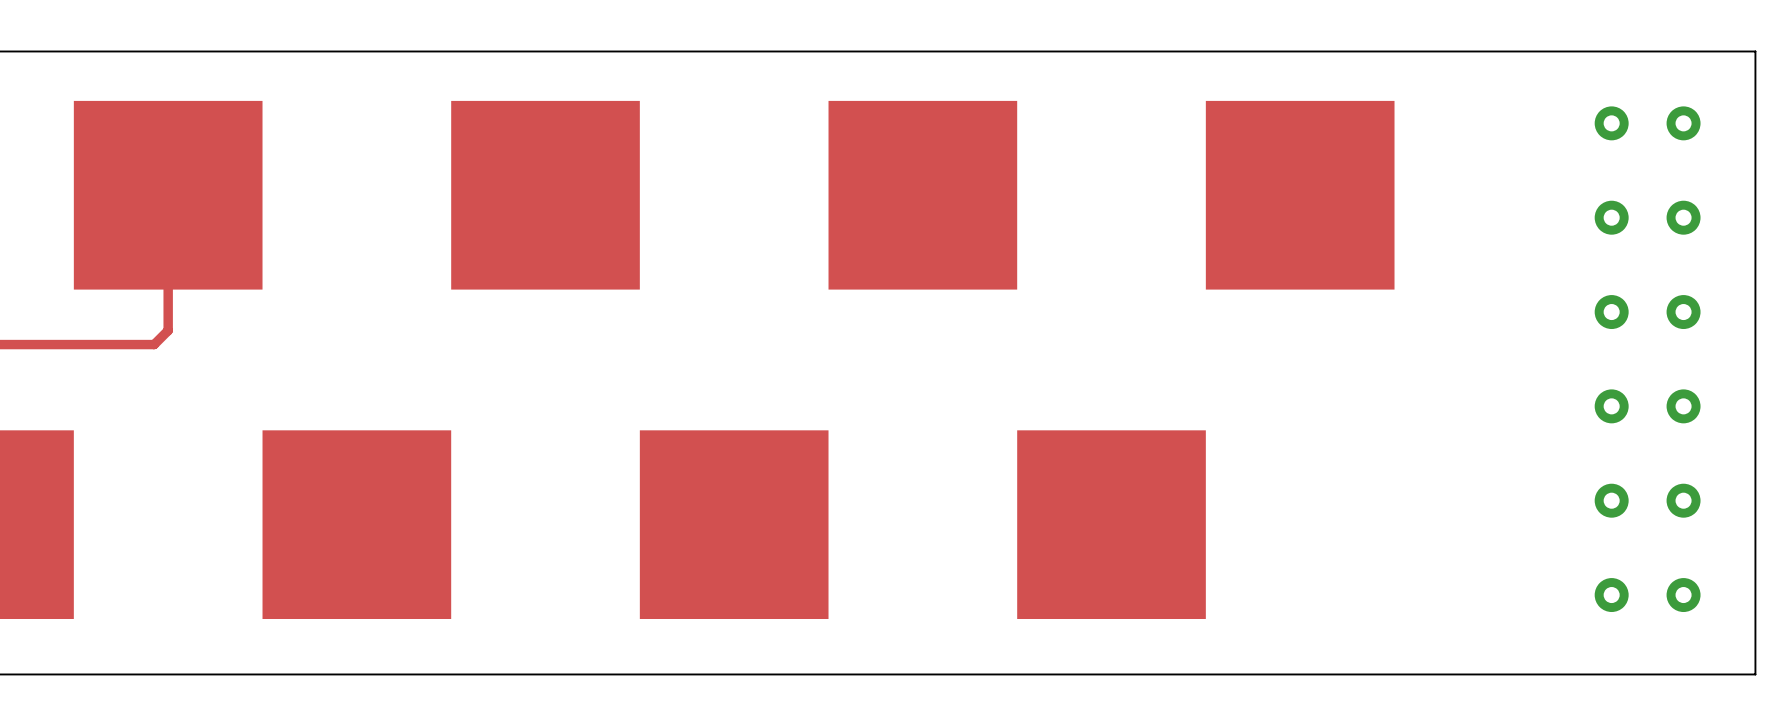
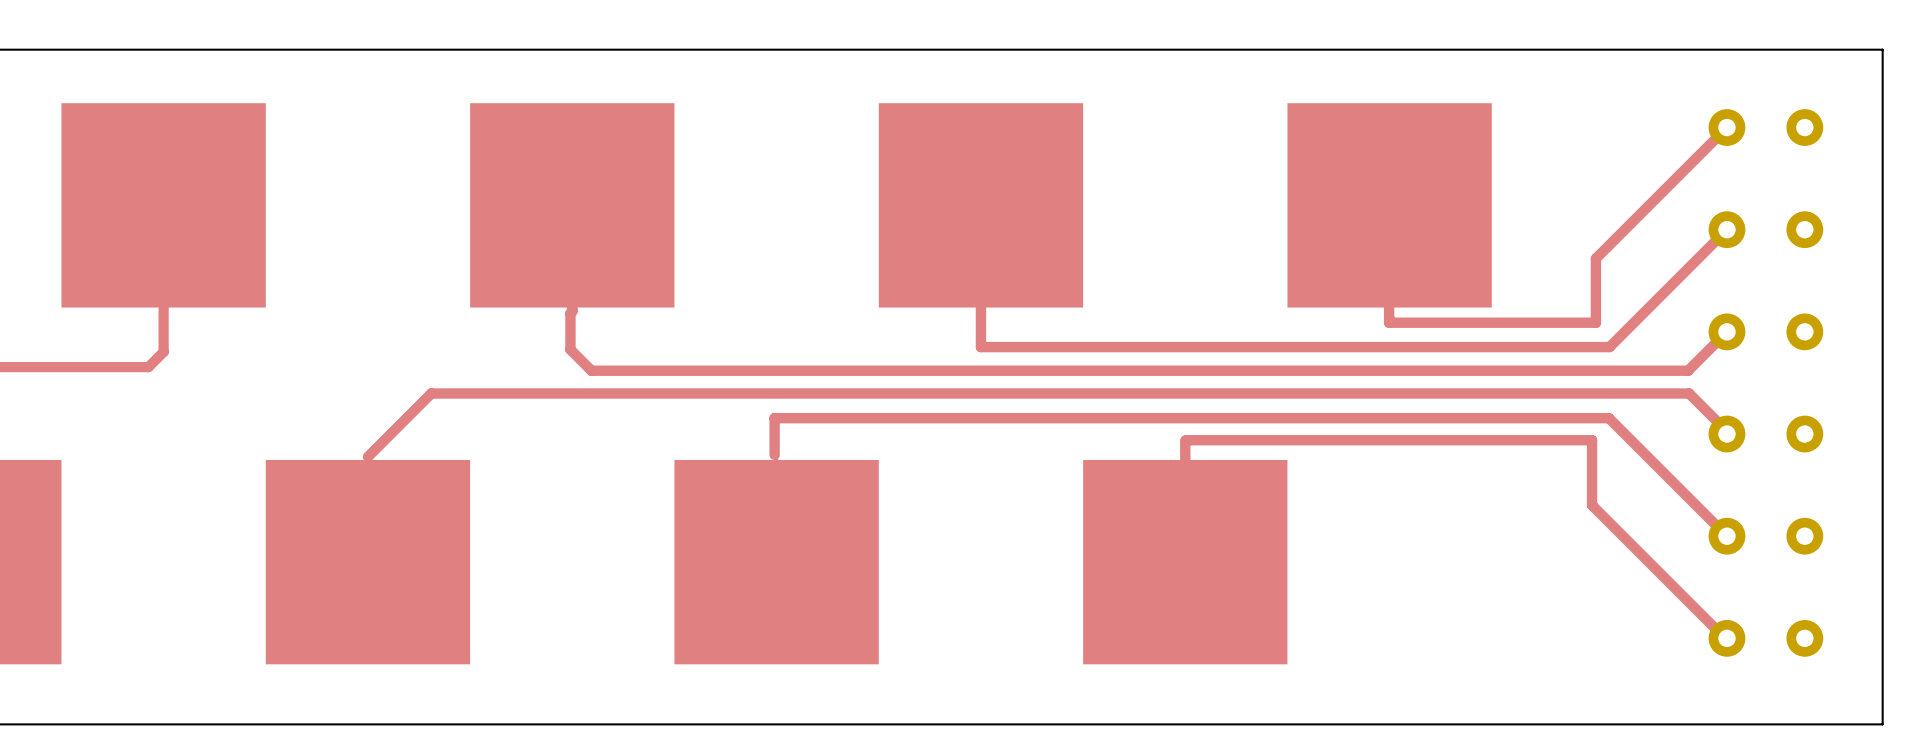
top track: none -> (1726, 127) (1595, 258) (1595, 322) (1389, 322) (1389, 205) (1389, 205) (1389, 310) (1389, 311)
top track: none -> (980, 205) (980, 347) (1609, 347) (1726, 229)
top track: none -> (572, 311) (570, 313) (570, 349) (591, 370) (1688, 370) (1726, 331)
top track: none -> (1728, 432) (1689, 393) (431, 393) (367, 456) (367, 562)
top track: none -> (1726, 536) (1608, 418) (774, 418) (776, 562)
top track: none -> (1185, 562) (1185, 440) (1592, 440) (1592, 505) (1724, 637)

